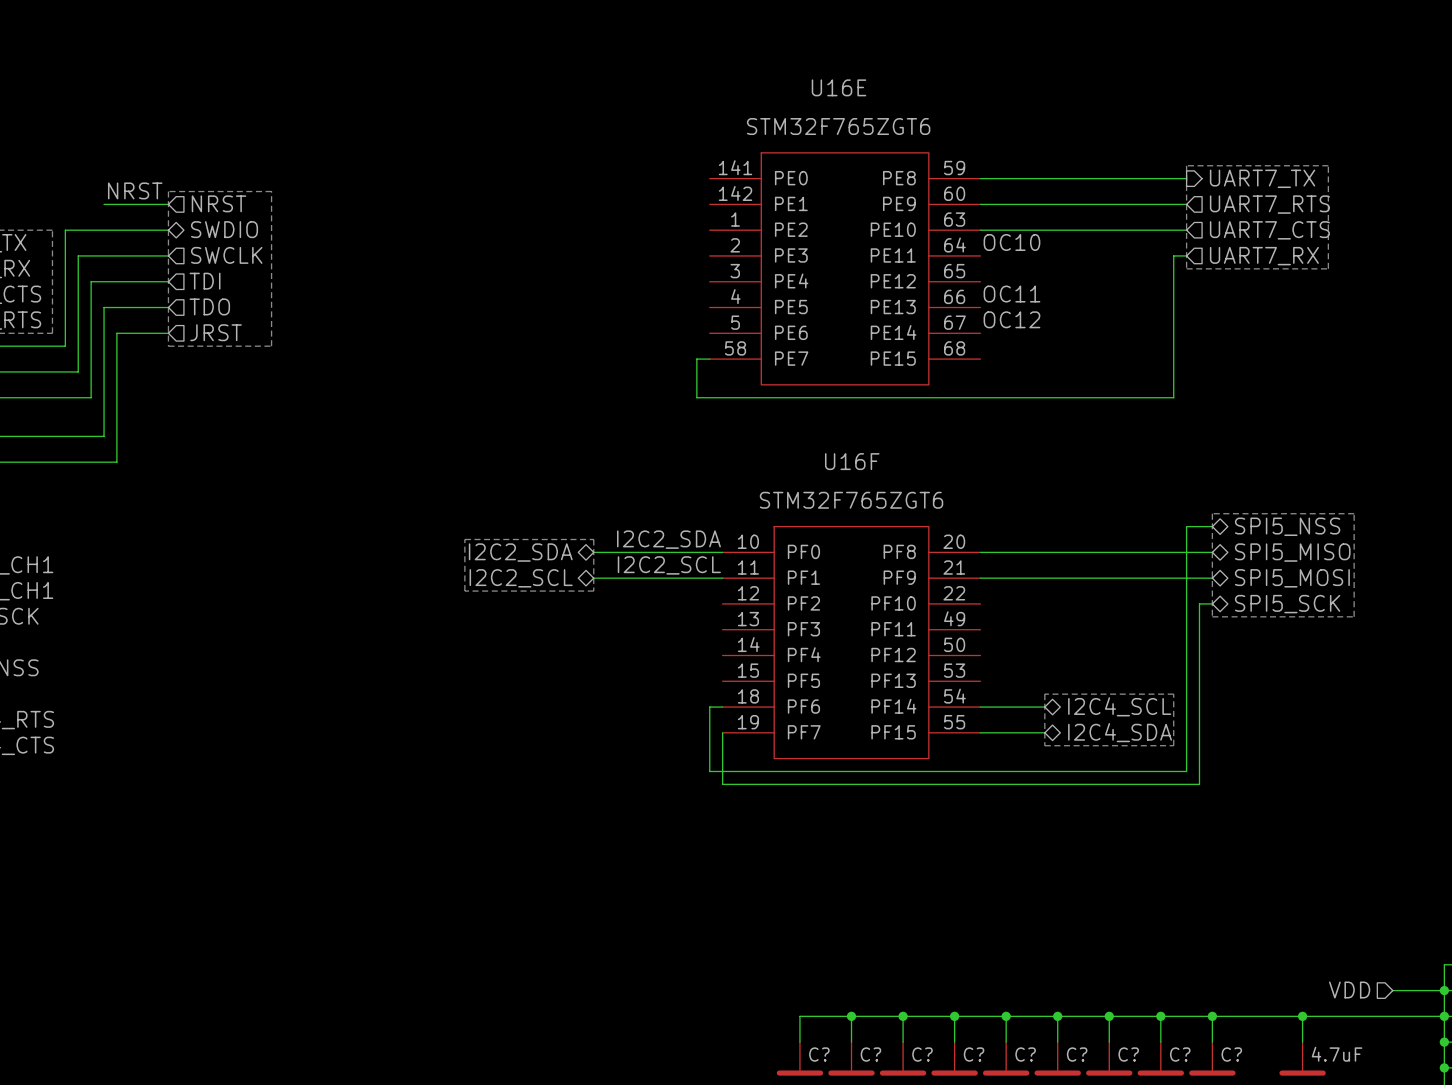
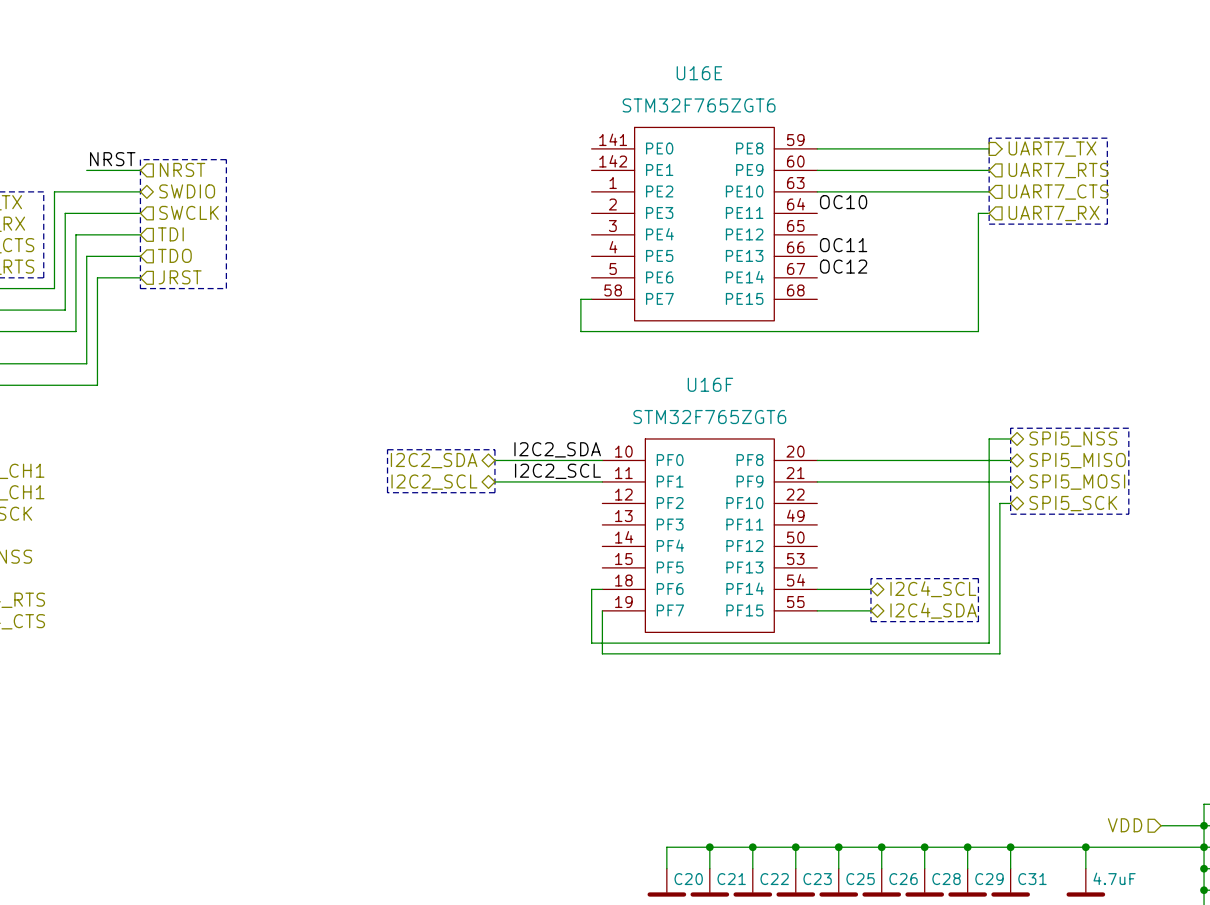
C? name: C? (819, 1054) -> C20 (688, 879)
C? name: C? (870, 1054) -> C21 (731, 879)
C? name: C? (922, 1054) -> C22 (774, 879)
C? name: C? (974, 1054) -> C23 (817, 879)
C? name: C? (1025, 1054) -> C25 (860, 879)
C? name: C? (1077, 1054) -> C26 (903, 879)
C? name: C? (1128, 1054) -> C28 (946, 879)
C? name: C? (1180, 1054) -> C29 (989, 879)
C? name: C? (1231, 1054) -> C31 (1032, 879)

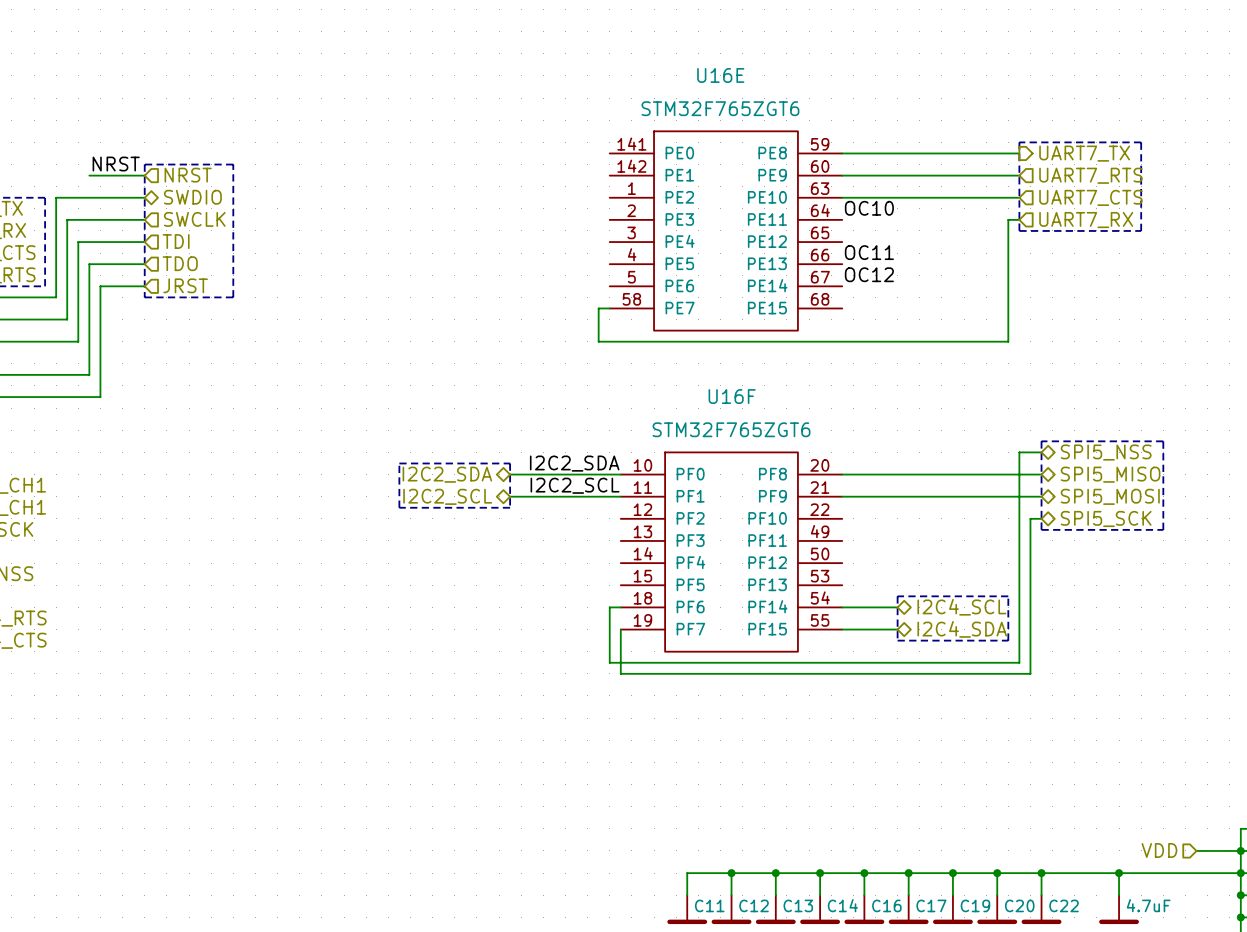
C20 name: C20 (688, 879) -> C11 (709, 905)
C21 name: C21 (731, 879) -> C12 (754, 905)
C22 name: C22 (774, 879) -> C13 (798, 905)
C23 name: C23 (817, 879) -> C14 (842, 905)
C25 name: C25 (860, 879) -> C16 (886, 905)
C26 name: C26 (903, 879) -> C17 (931, 905)
C28 name: C28 (946, 879) -> C19 (975, 905)
C29 name: C29 (989, 879) -> C20 (1019, 905)
C31 name: C31 (1032, 879) -> C22 (1064, 905)

